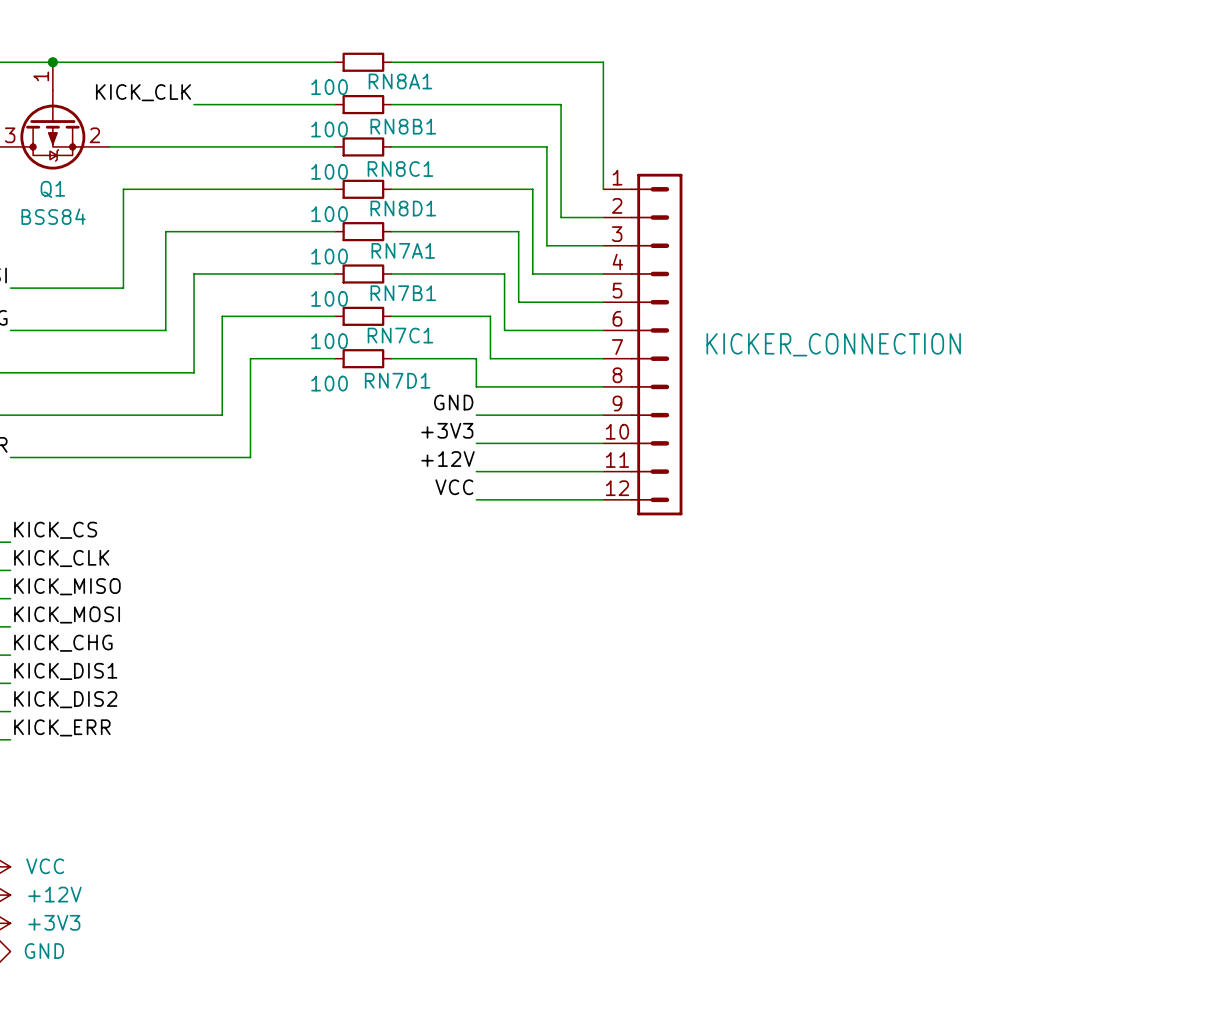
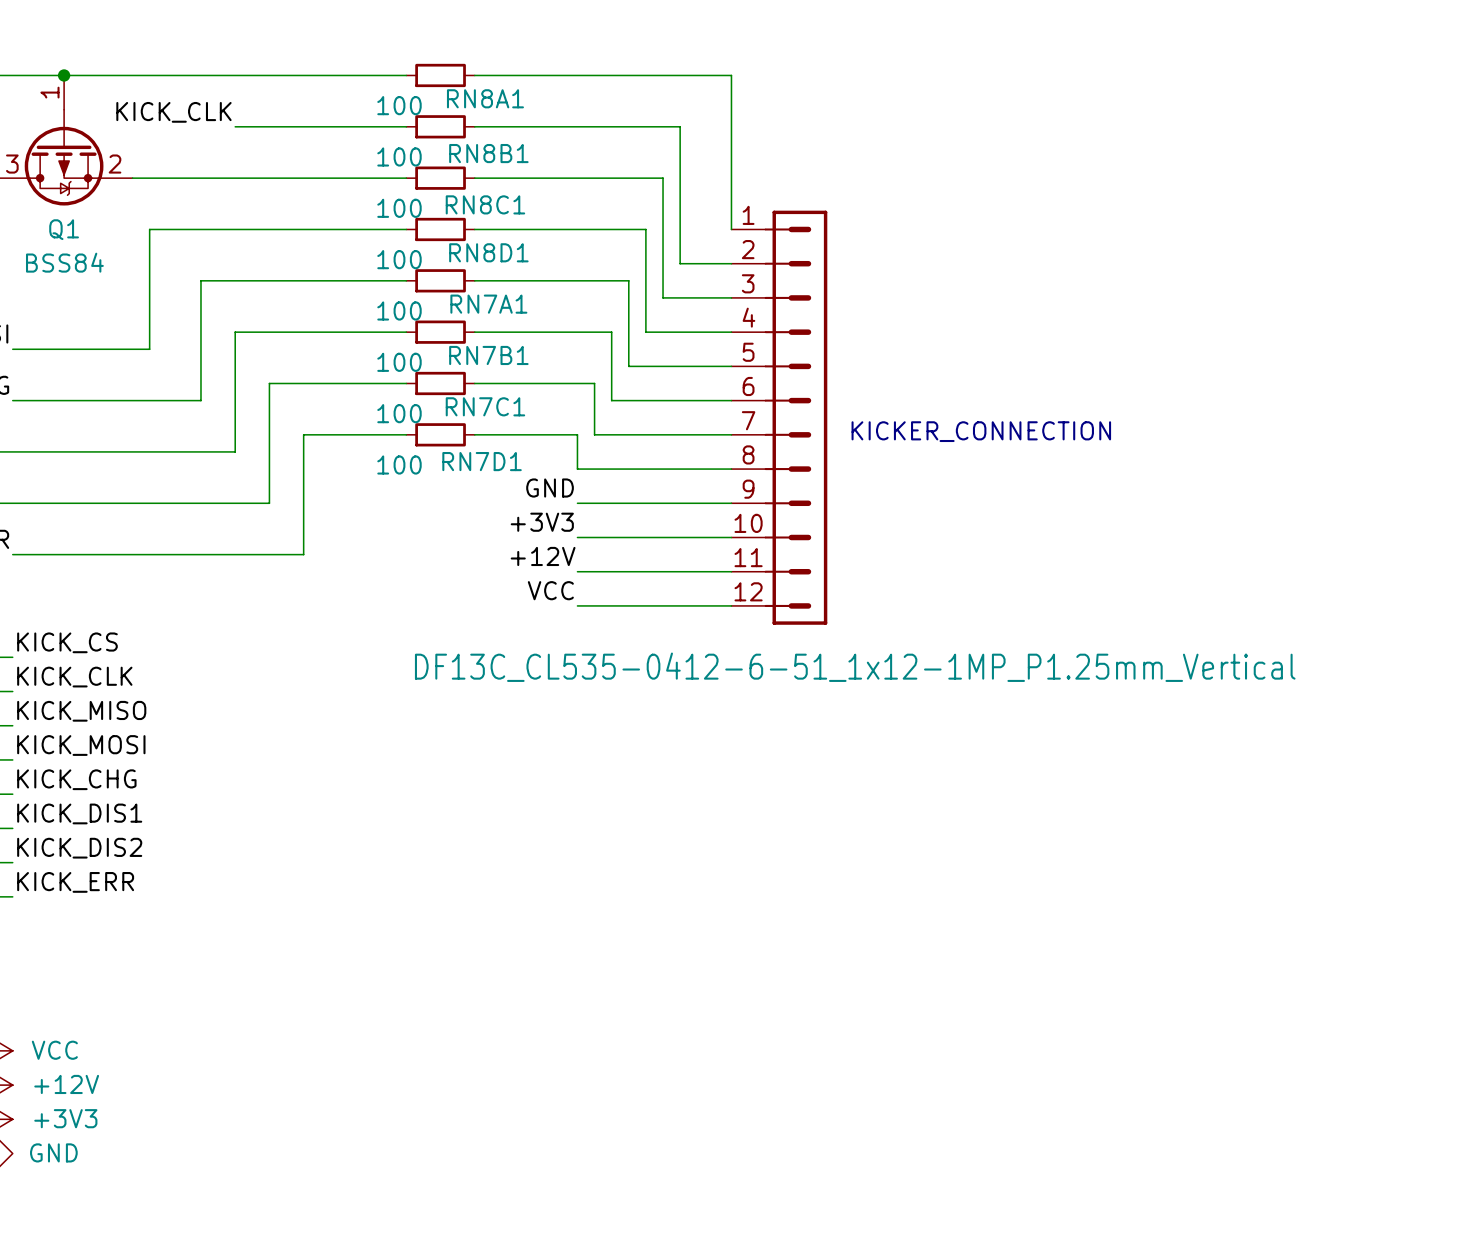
part value: KICKER_CONNECTION (833, 344) -> DF13C_CL535-0412-6-51_1x12-1MP_P1.25mm_Vertical (855, 667)
text: none -> KICKER_CONNECTION (981, 431)

